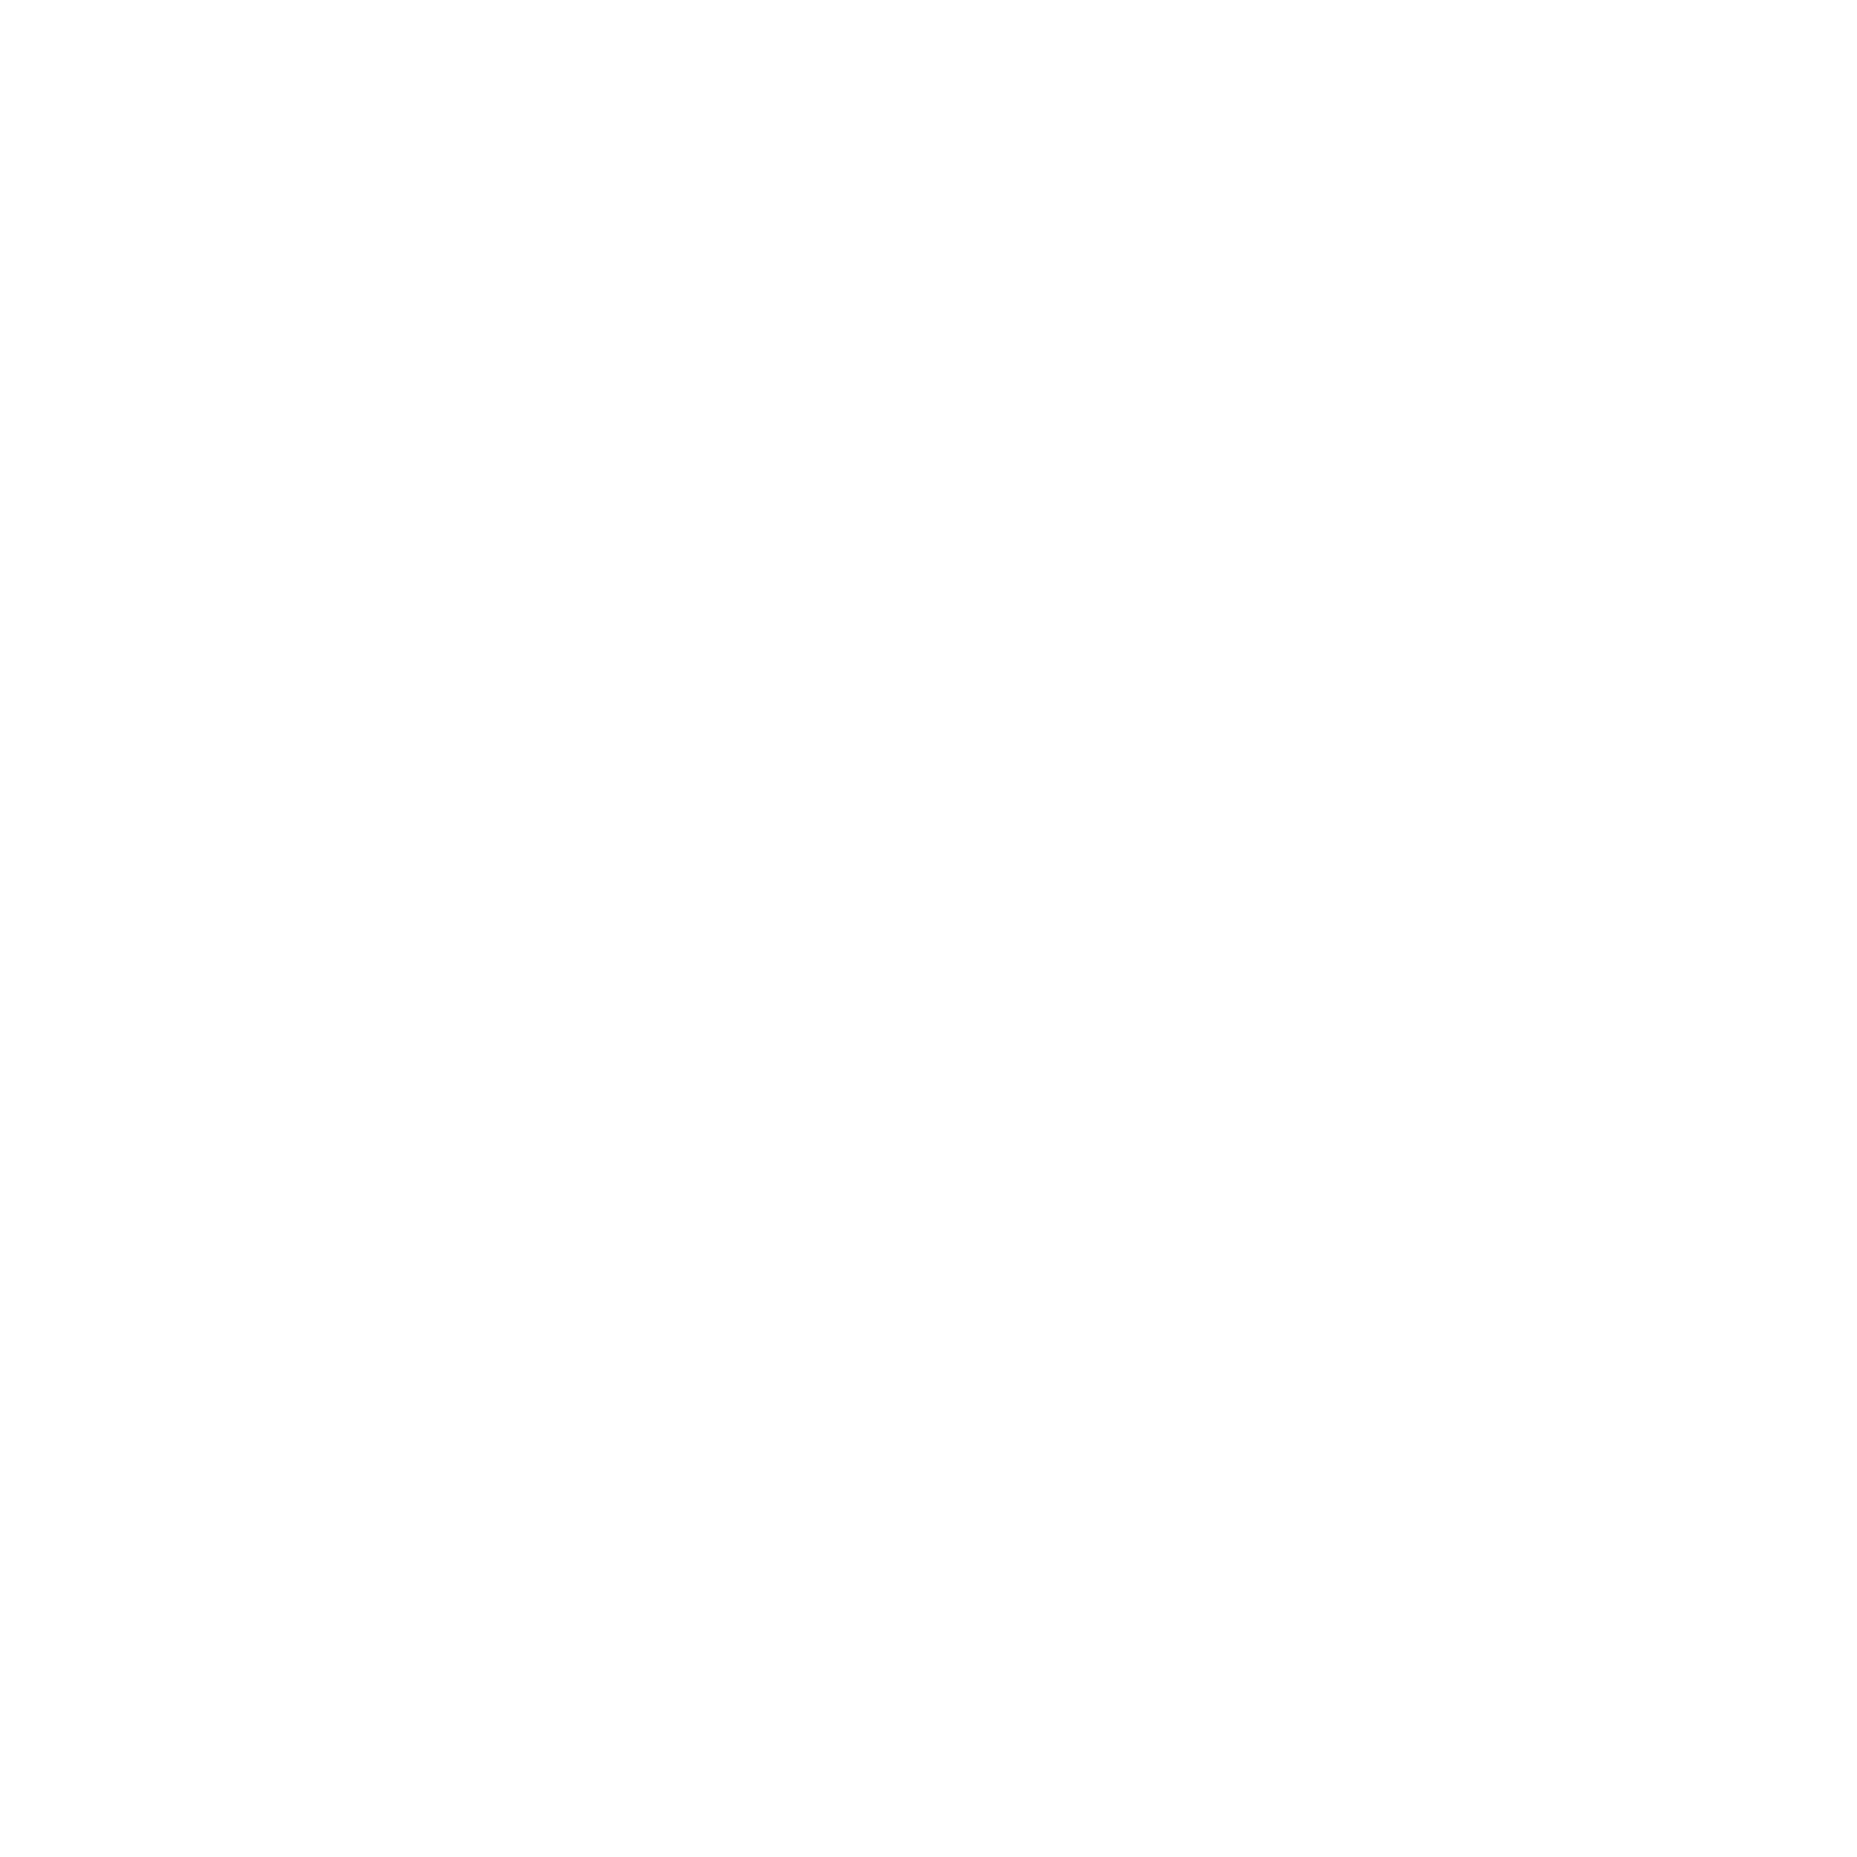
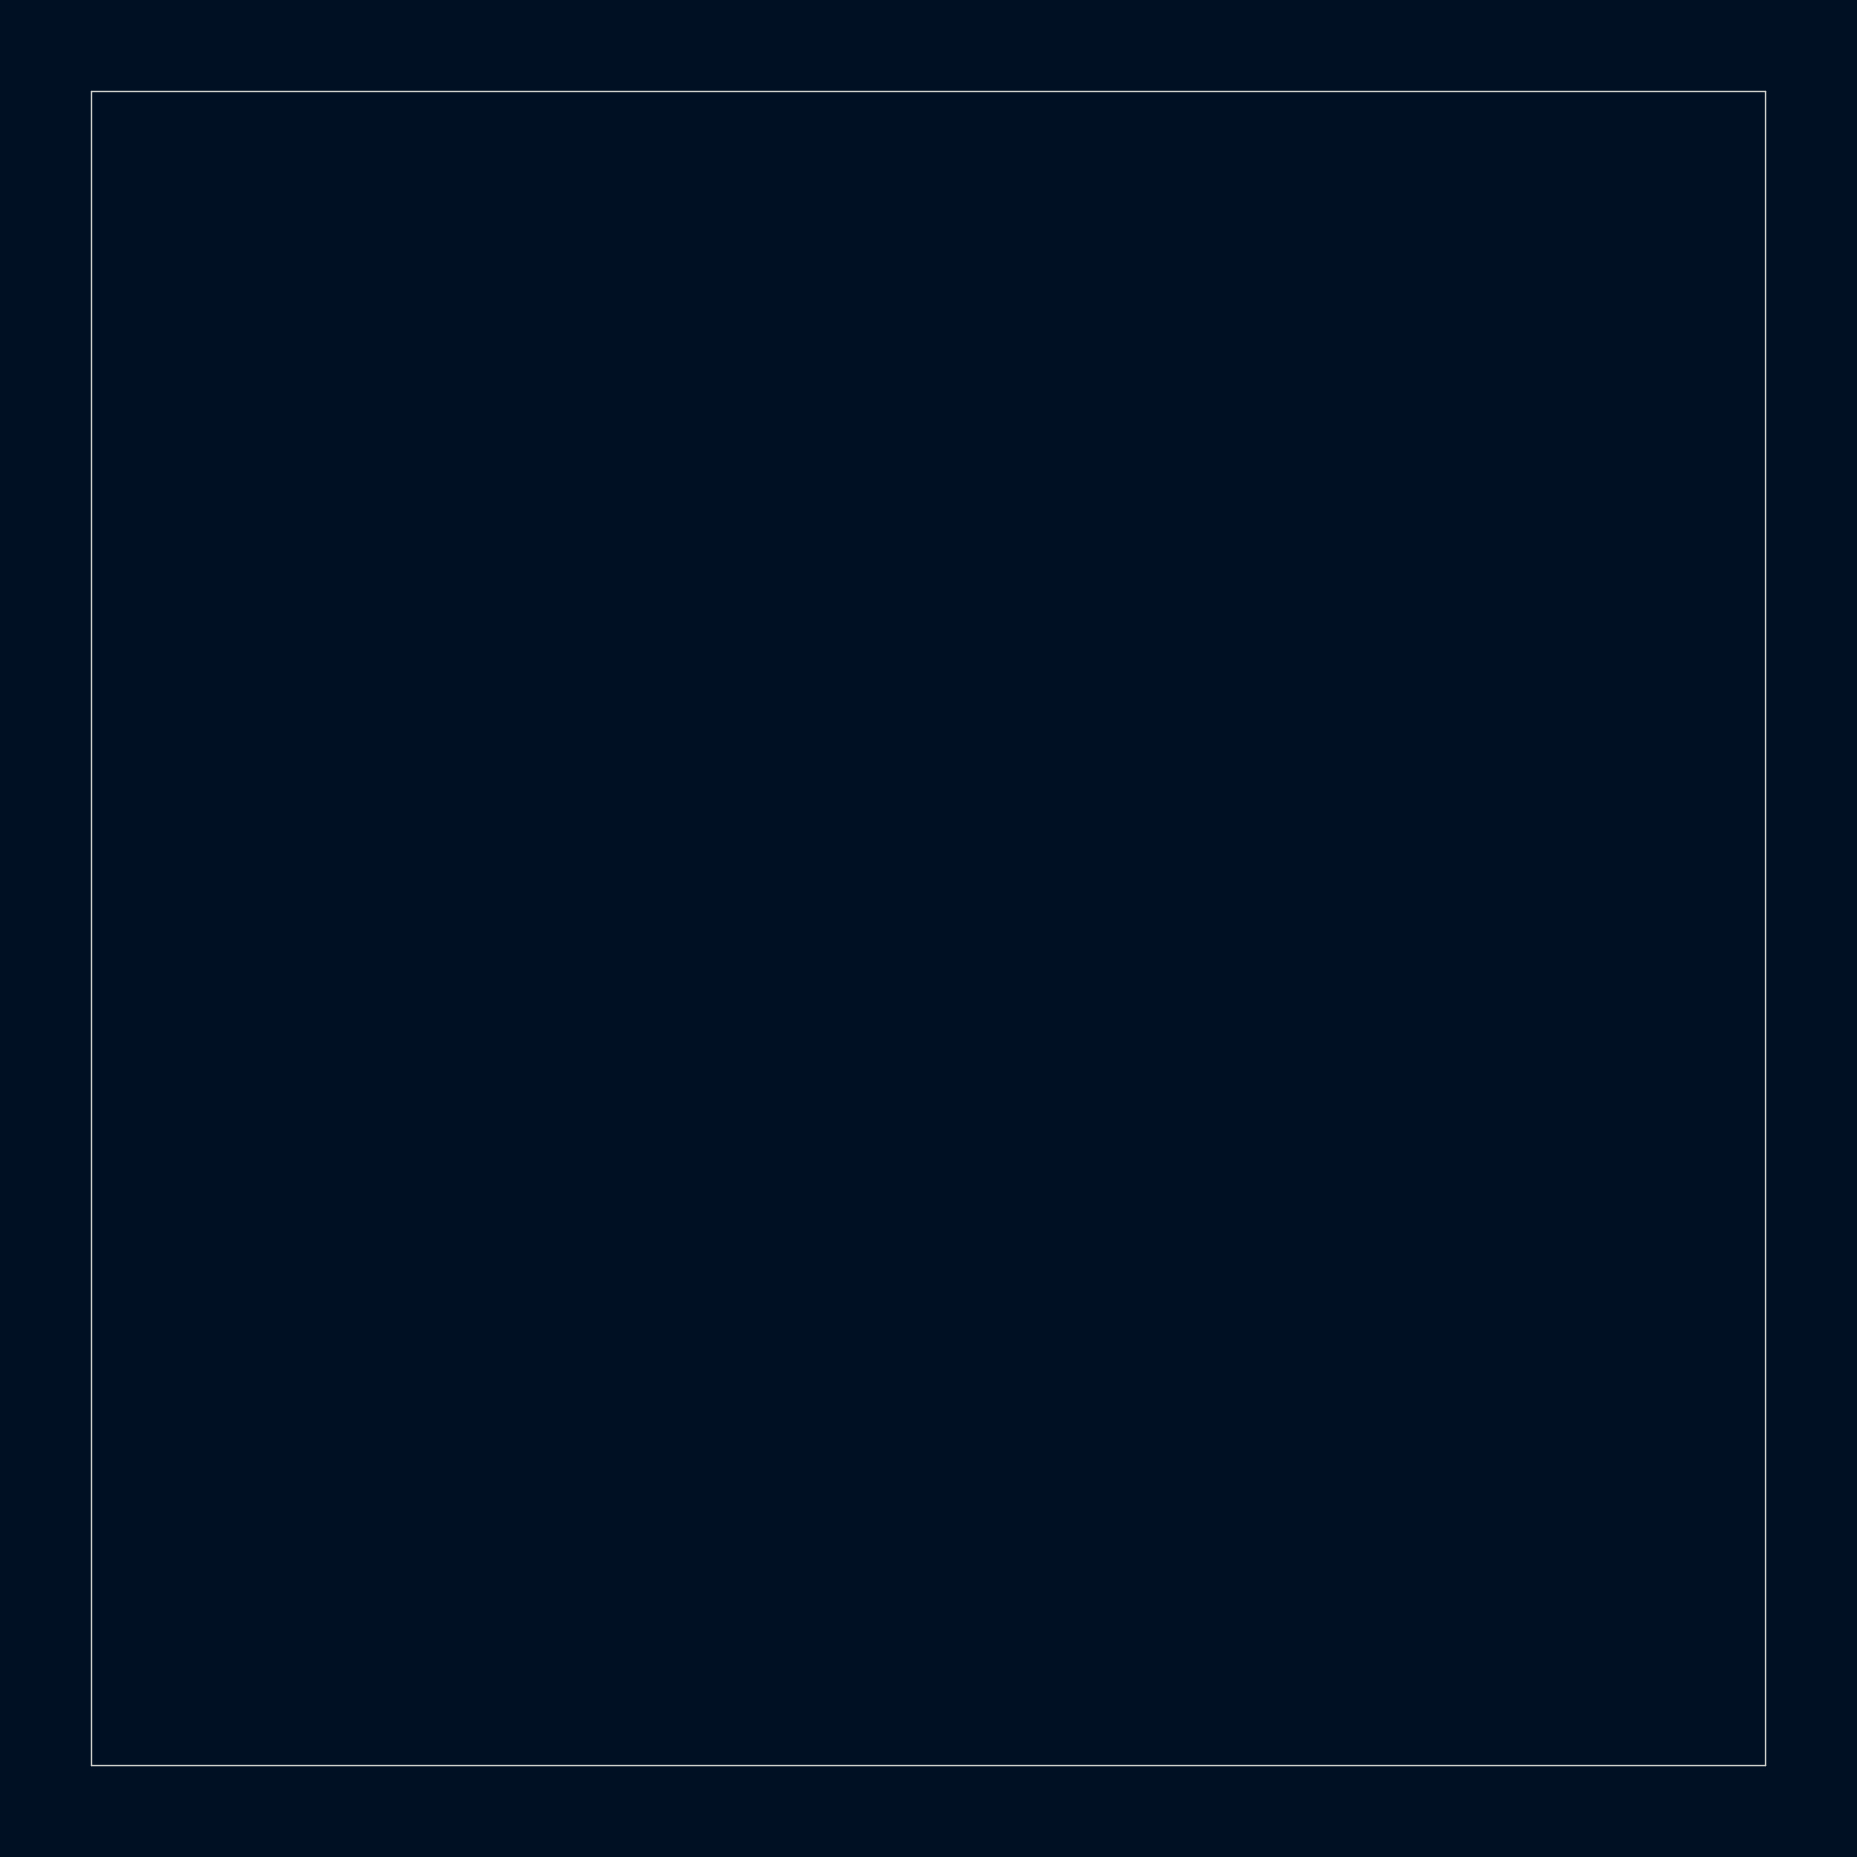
board edge: none -> (1765, 91) (91, 91) (91, 1765) (1765, 1765) (1765, 91)

